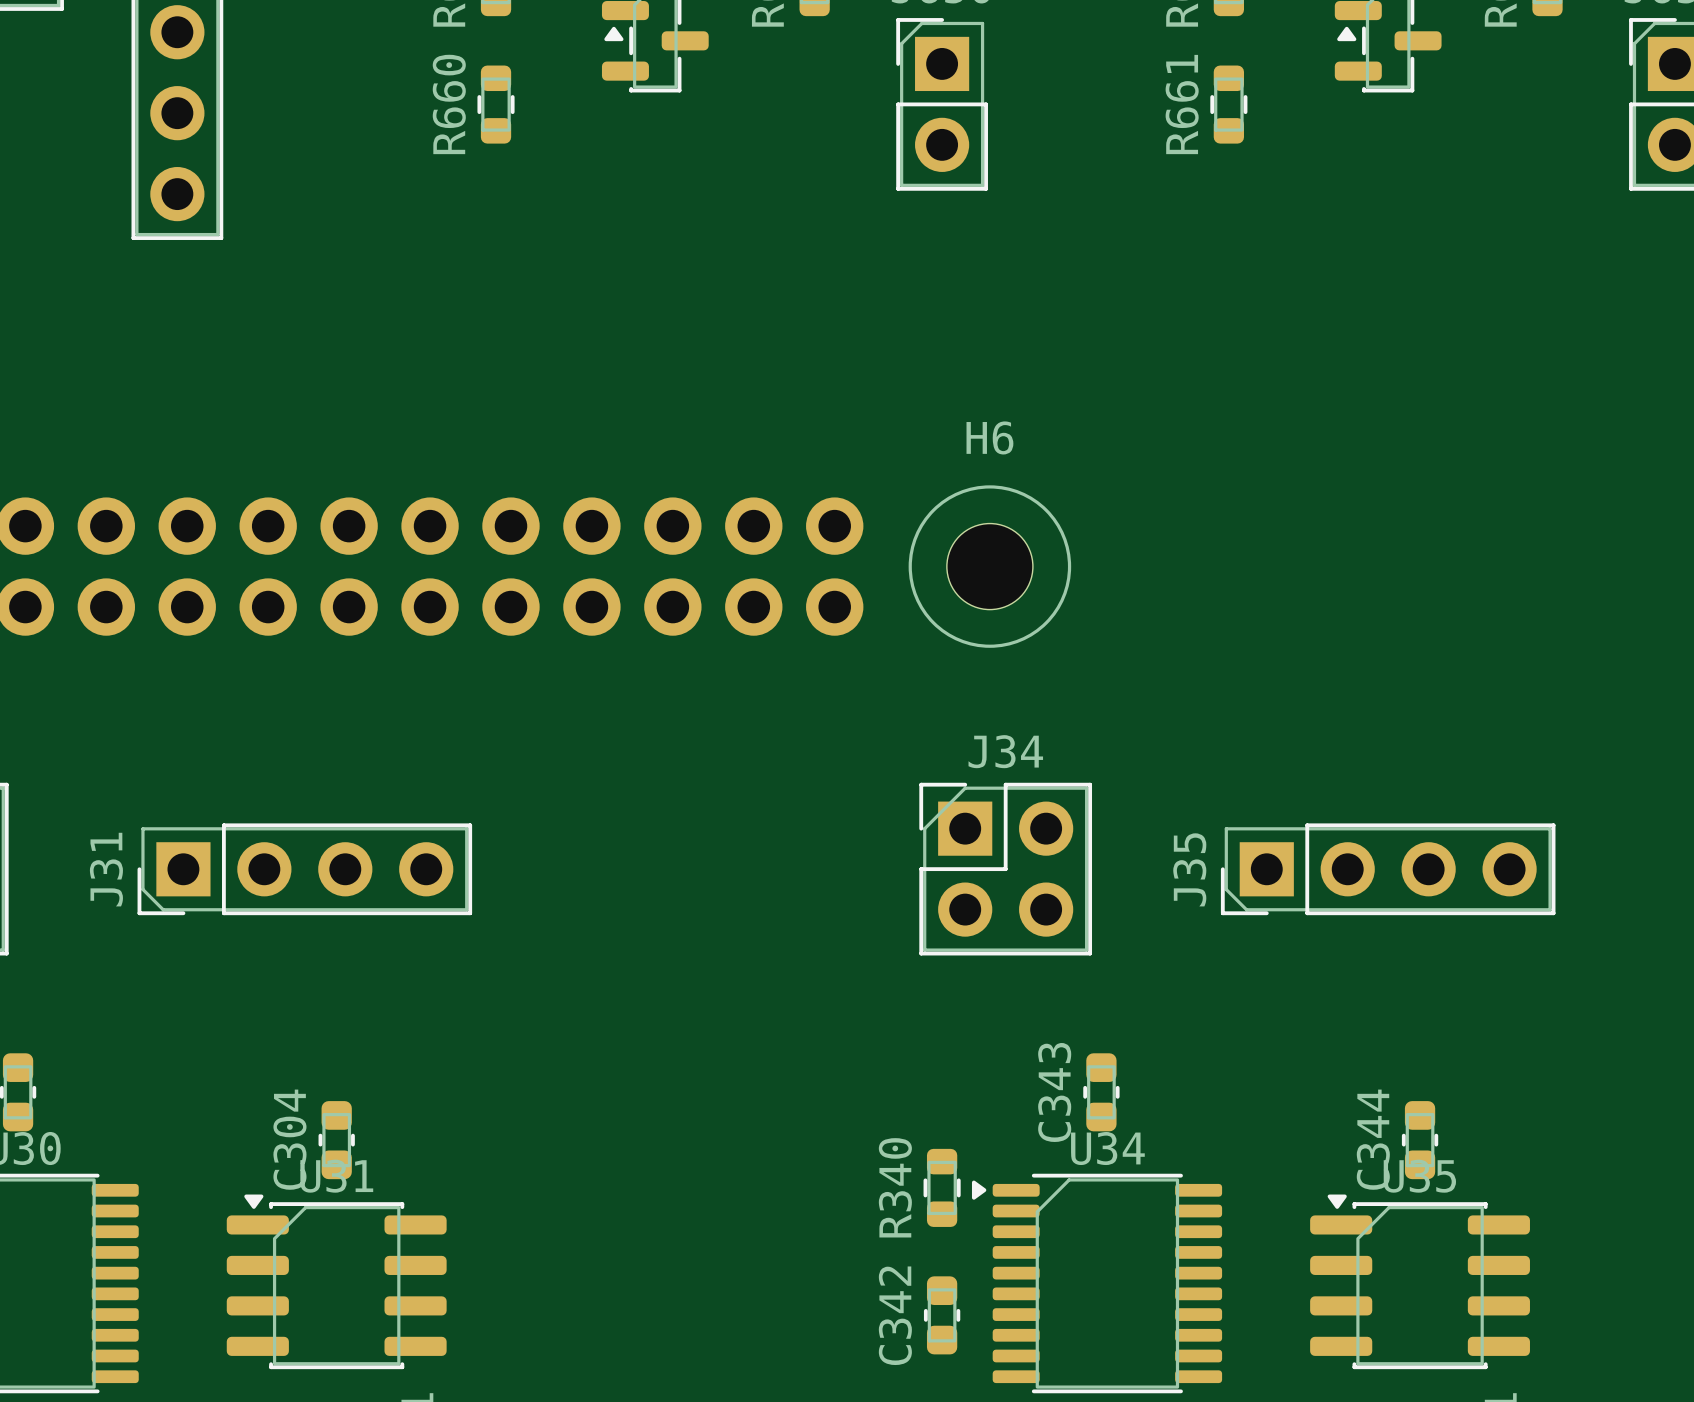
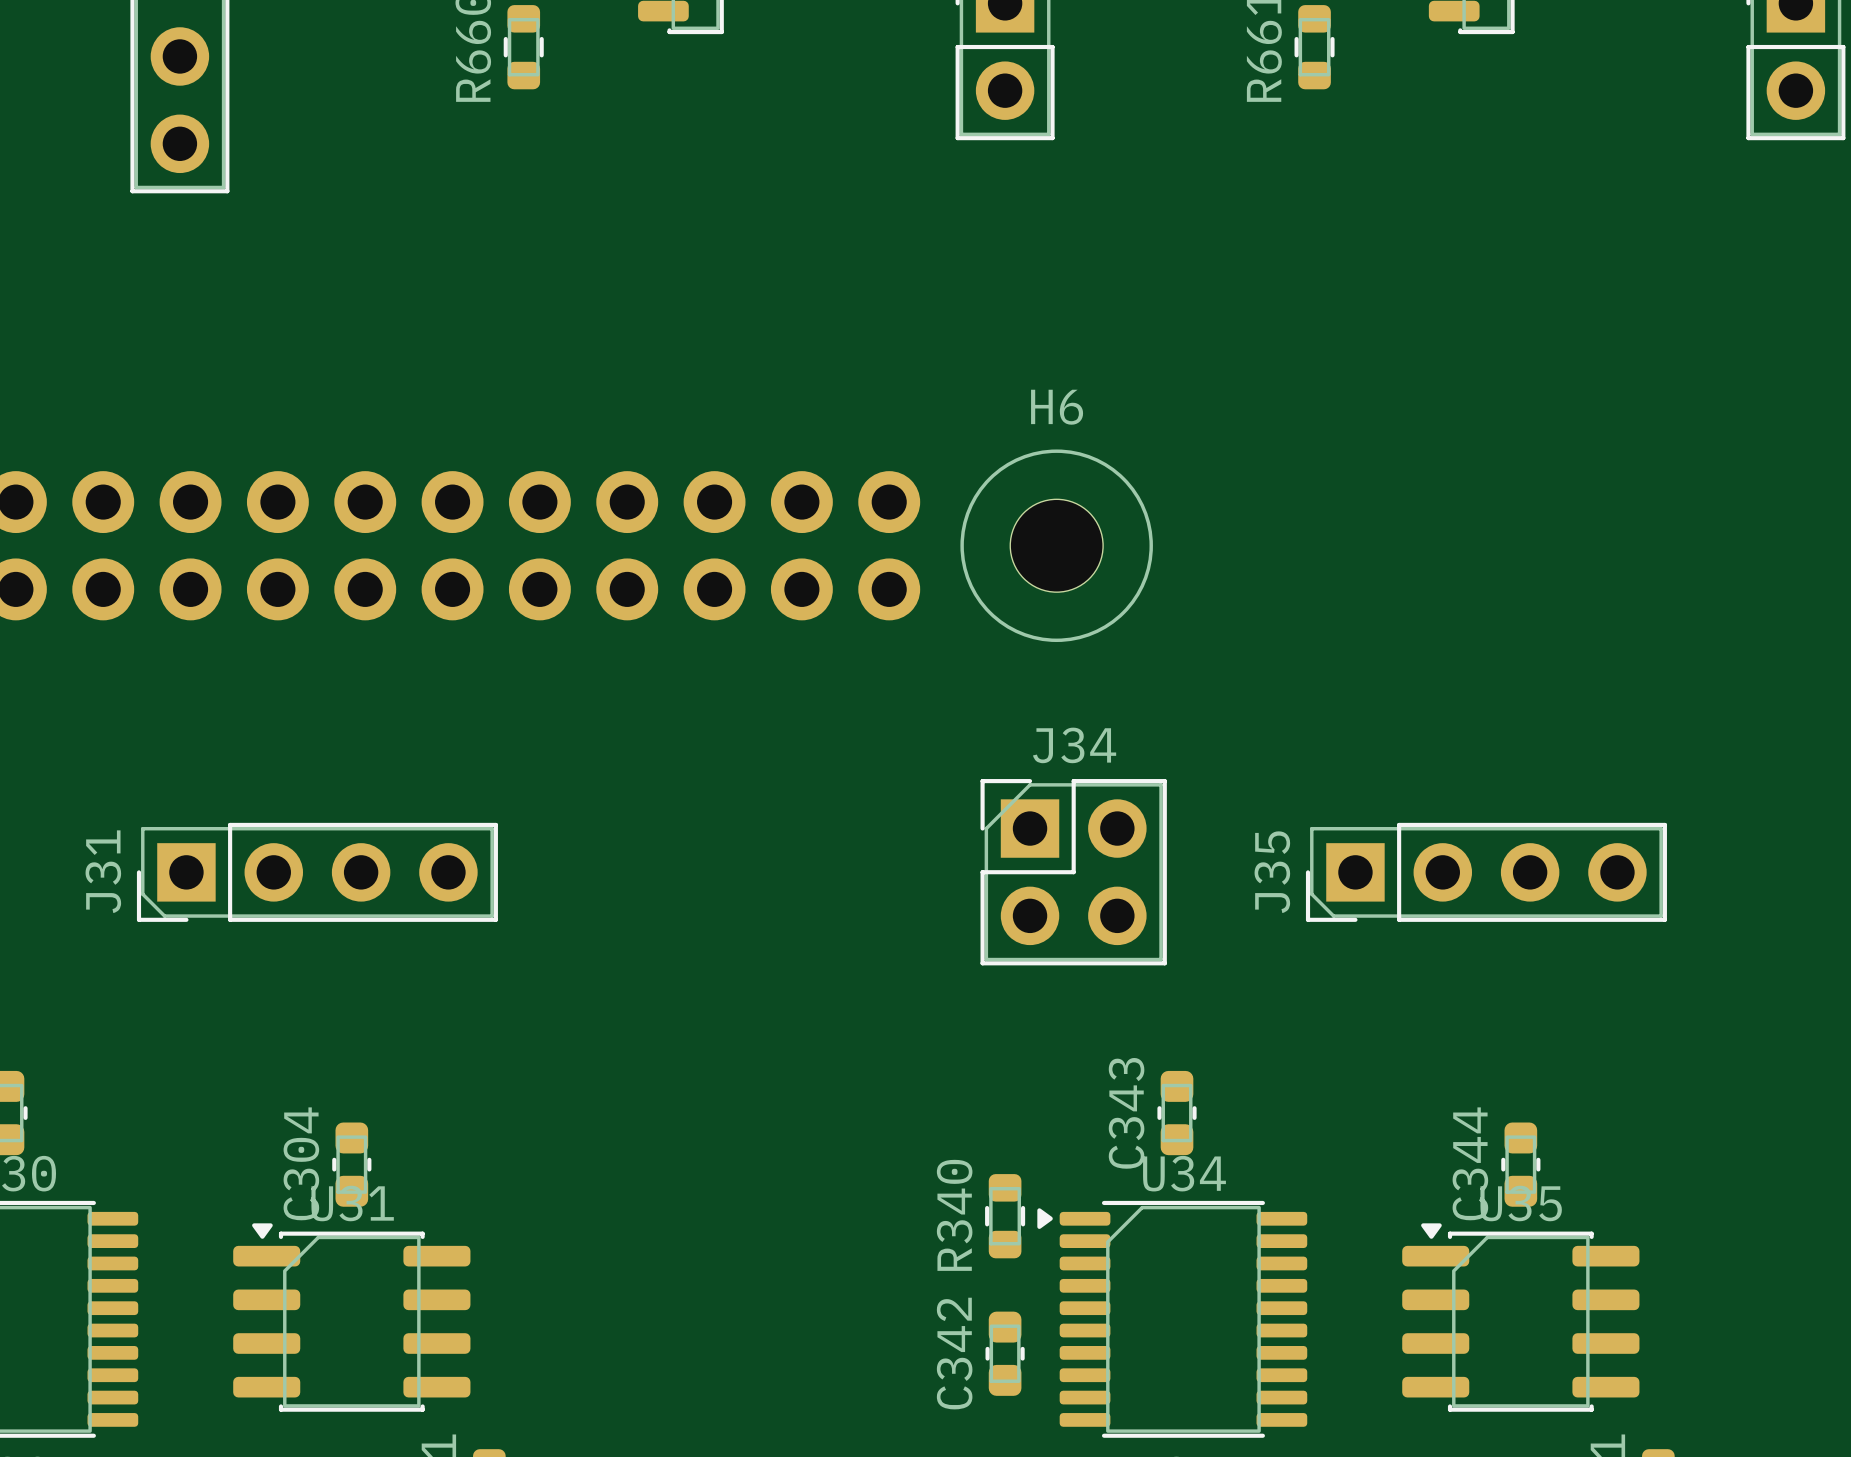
H6 footprint: [908, 485, 1072, 648] -> [960, 449, 1153, 643]

